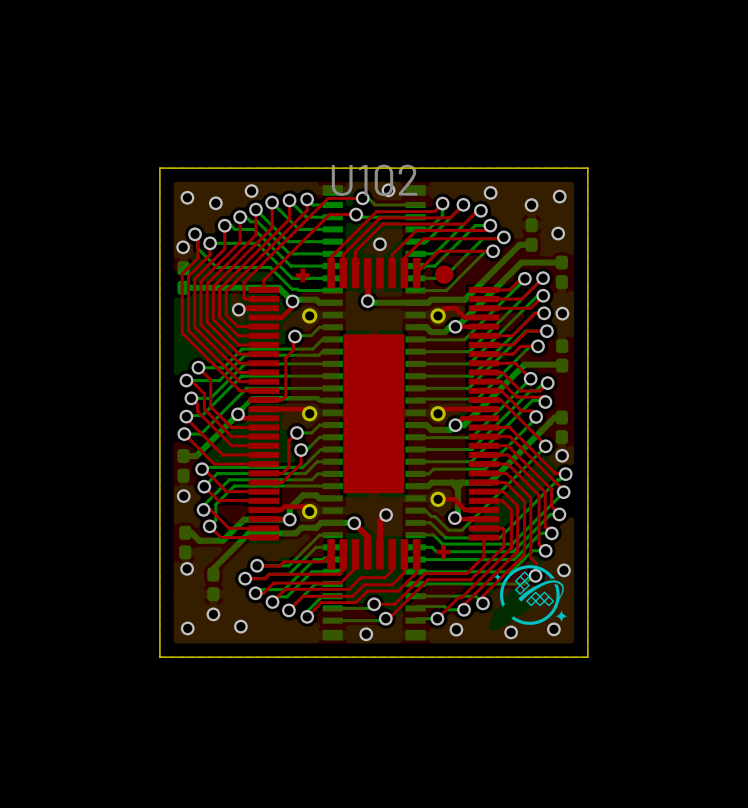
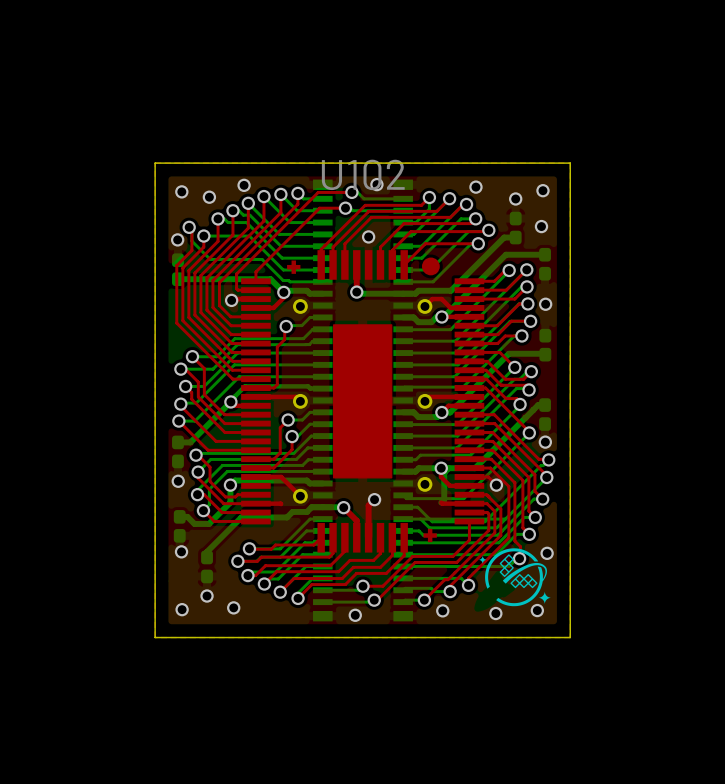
top track: (216, 481) (226, 491) (263, 491) -> (210, 467) (210, 481) (225, 496) (255, 494)
top track: none -> (440, 468) (440, 476) (449, 485) (469, 485)
via: none -> (441, 468)
top track: (204, 486) (218, 500) (263, 500) -> (198, 472) (198, 478) (223, 503) (255, 503)
bottom track: (302, 495) (289, 508) (289, 519) (243, 519) (222, 540) (199, 540) (191, 532) -> (293, 480) (235, 480) (230, 485) (230, 502) (208, 523) (194, 523) (185, 516)
top track: (438, 499) (454, 499) (465, 510) (483, 510) -> none
top track: (483, 500) (502, 500) (511, 509) (510, 549) -> (469, 503) (487, 503) (494, 511) (494, 532)
top track: (511, 500) (517, 505) (517, 551) (464, 605) -> (469, 494) (486, 494) (500, 508) (500, 535) (450, 586)
via: none -> (496, 485)
top track: (304, 506) (284, 506) (281, 510) (263, 510) -> (295, 491) (281, 476) (255, 476)
bottom track: (415, 510) (425, 510) (431, 516) (435, 516) (448, 530) (461, 530) (478, 513) -> (403, 495) (406, 498) (463, 498)
via: (454, 518) -> none
via position: (289, 519) -> (230, 485)

